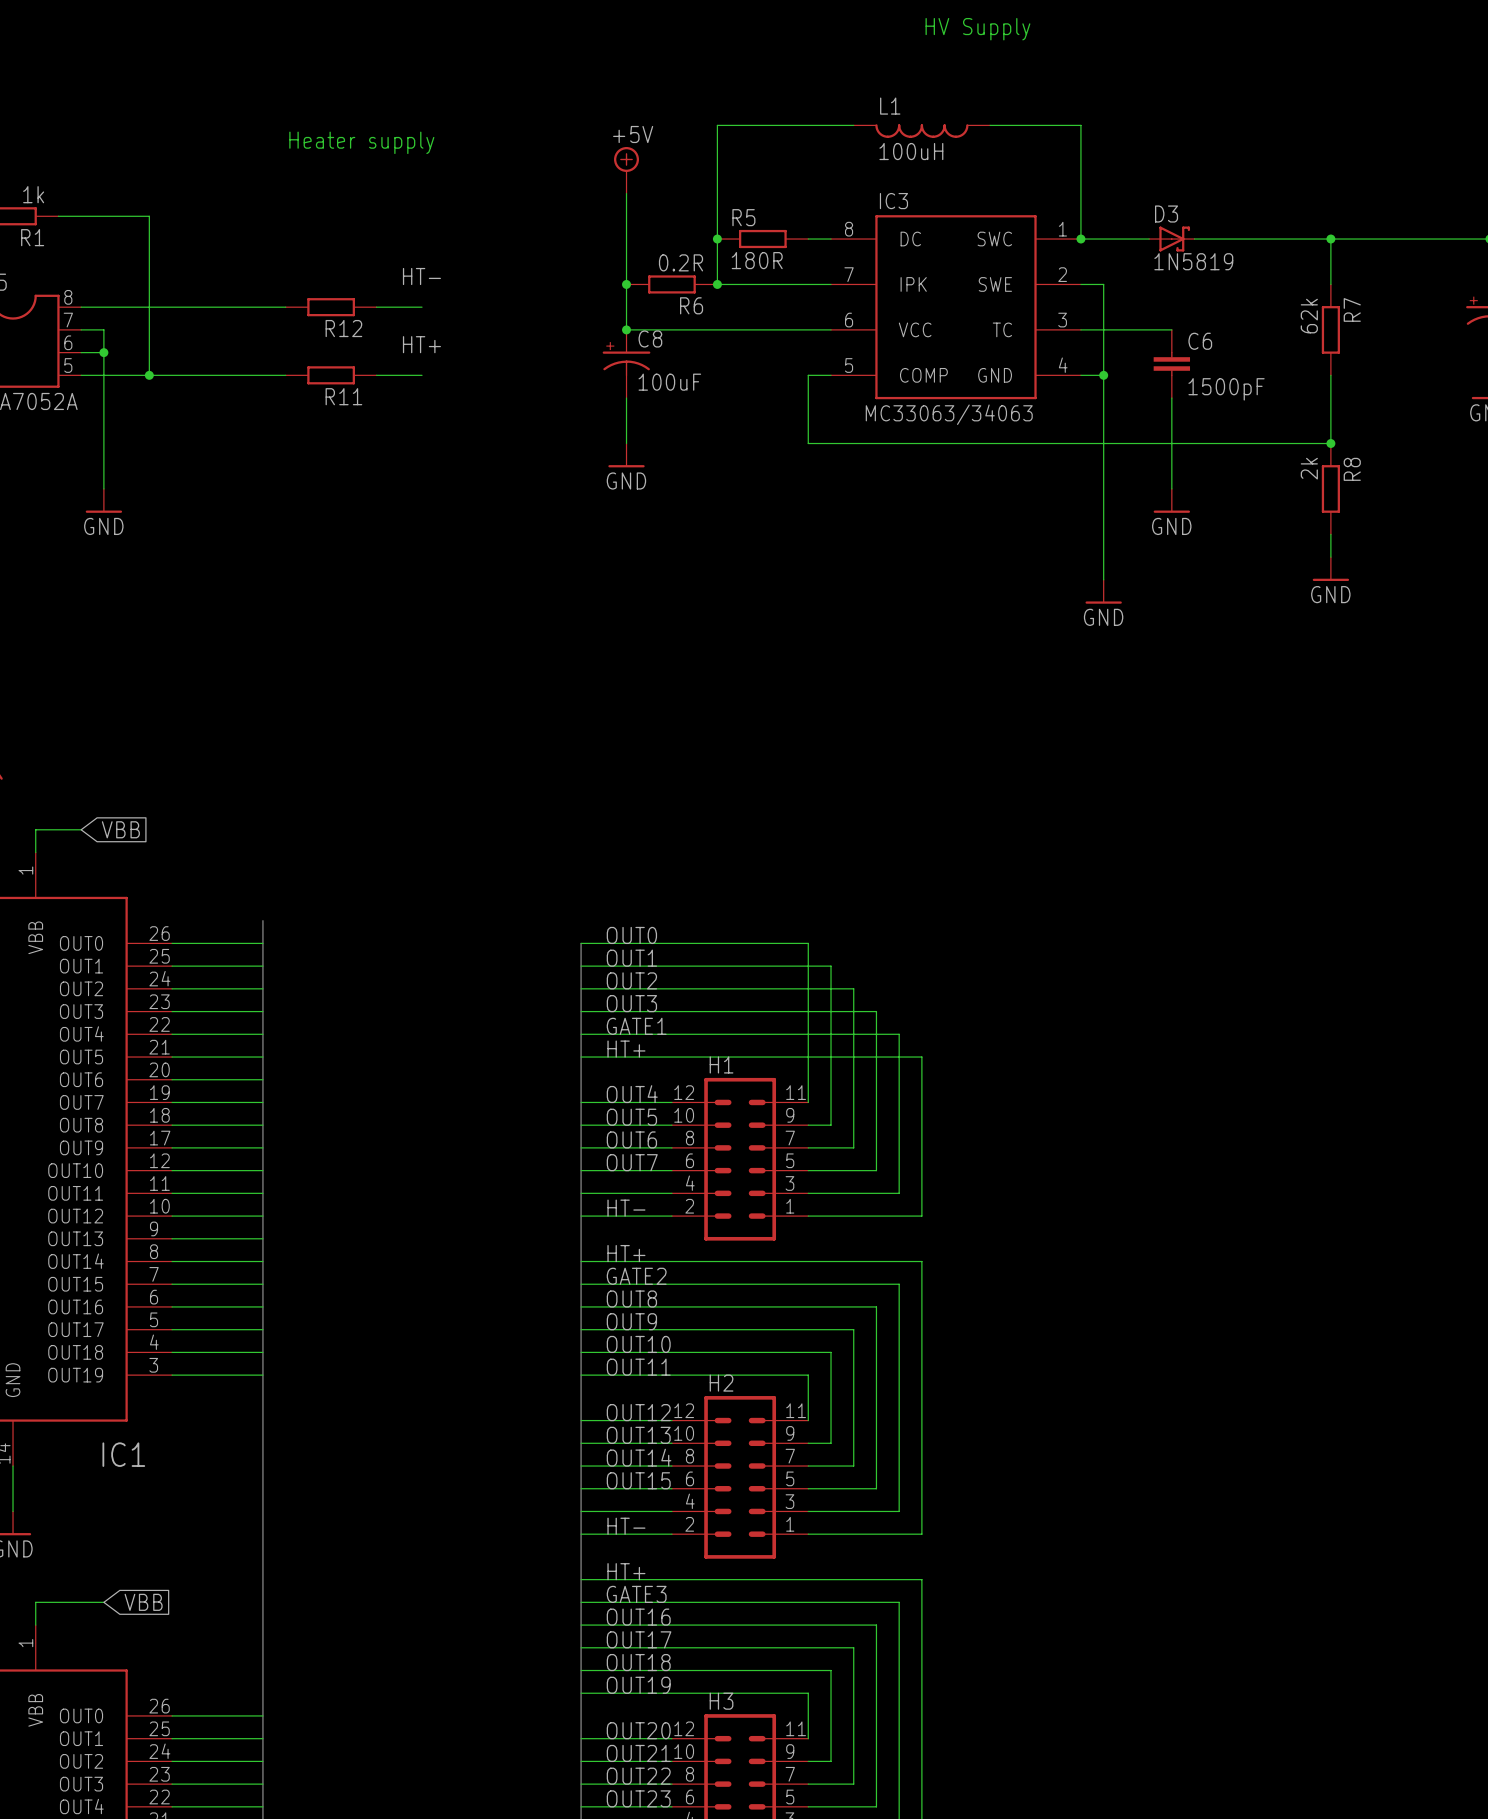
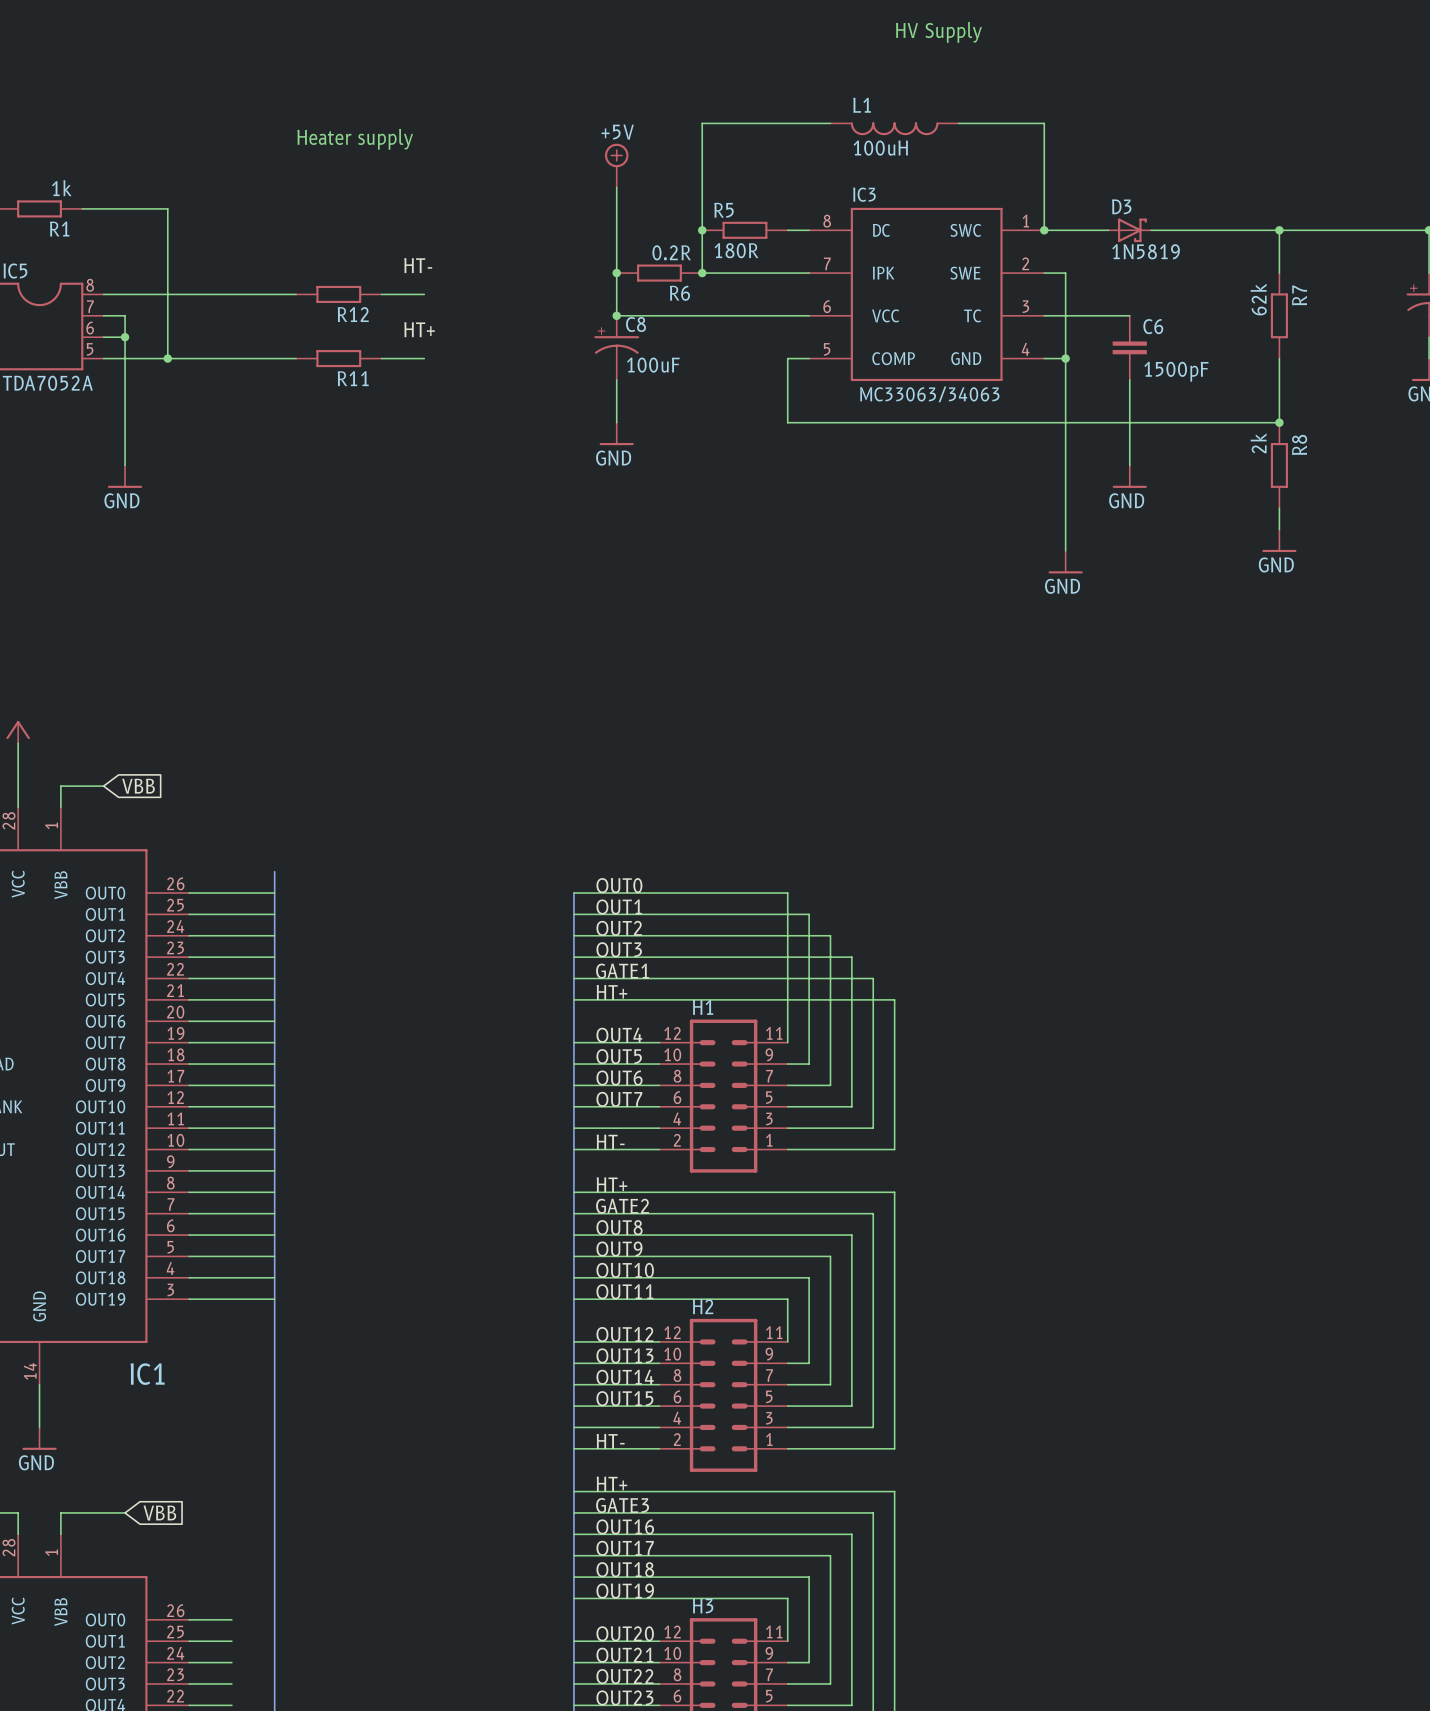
wire: (217, 1715) (262, 1715) -> none
wire: (217, 1738) (262, 1738) -> none
wire: (217, 1761) (262, 1761) -> none
wire: (217, 1784) (262, 1784) -> none
wire: (217, 1806) (262, 1806) -> none

